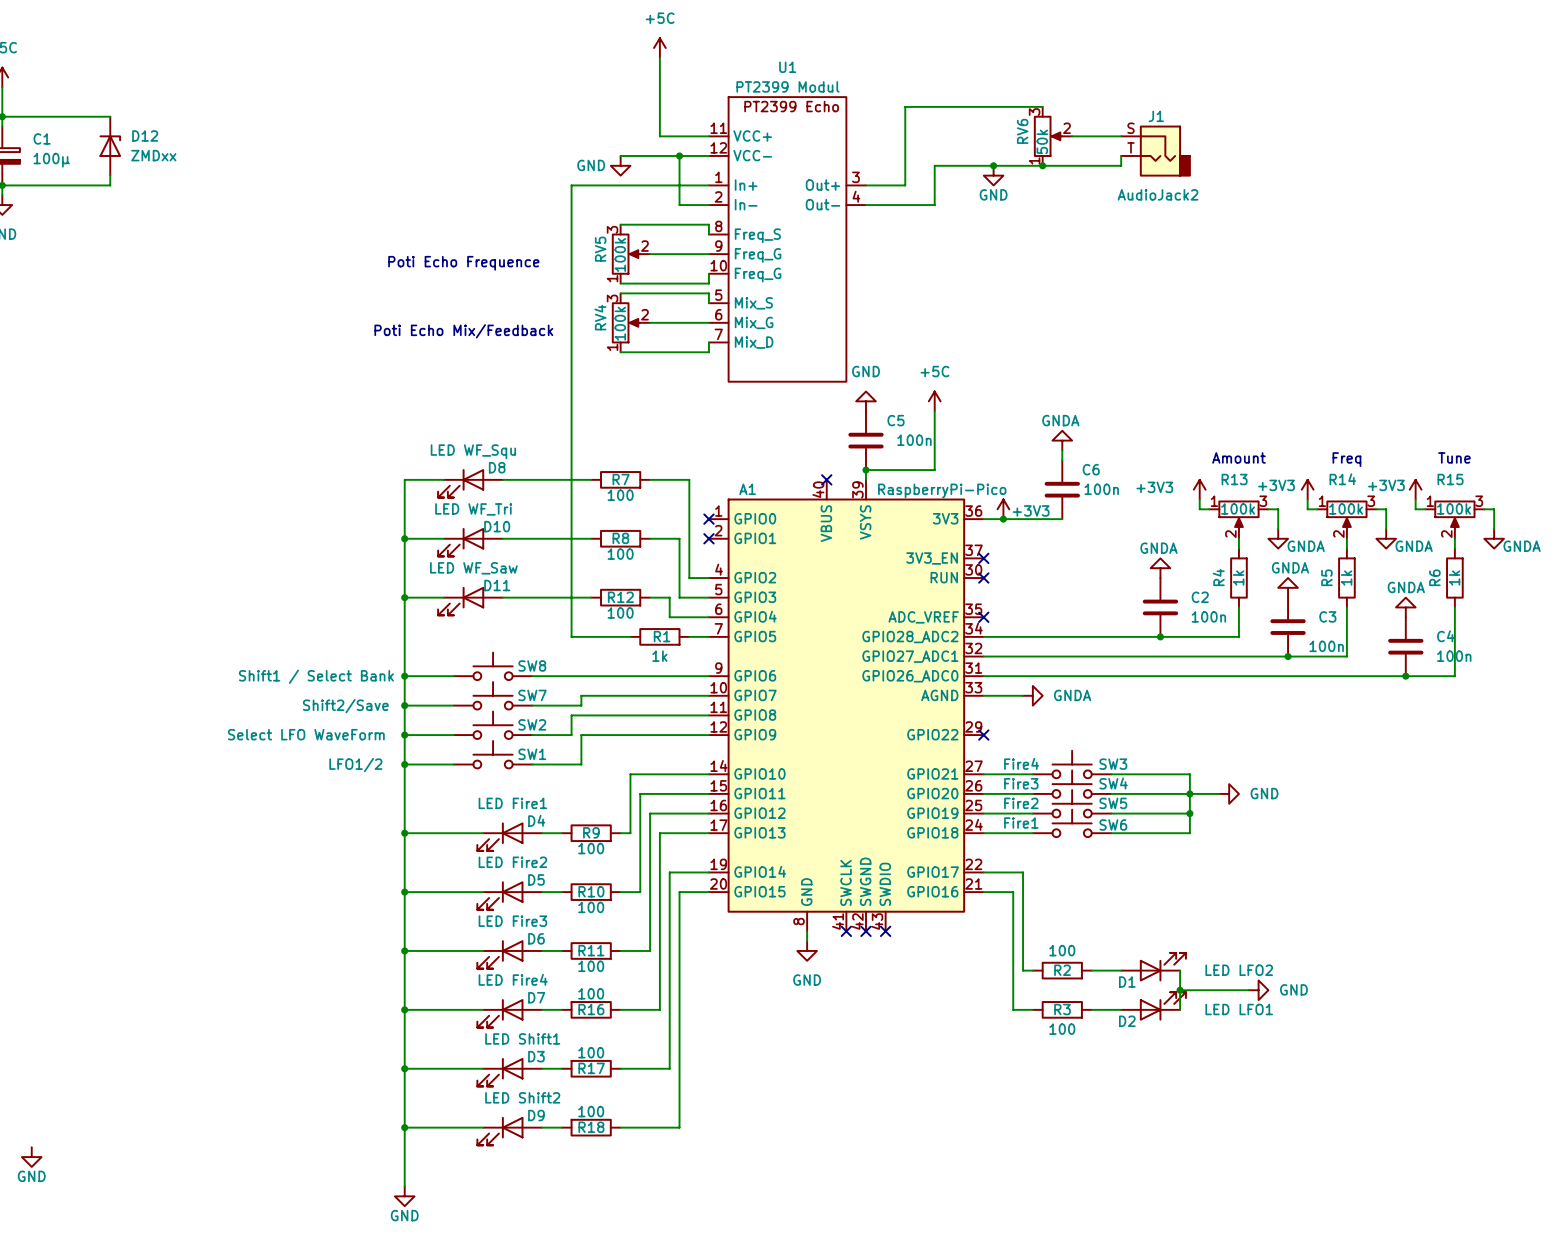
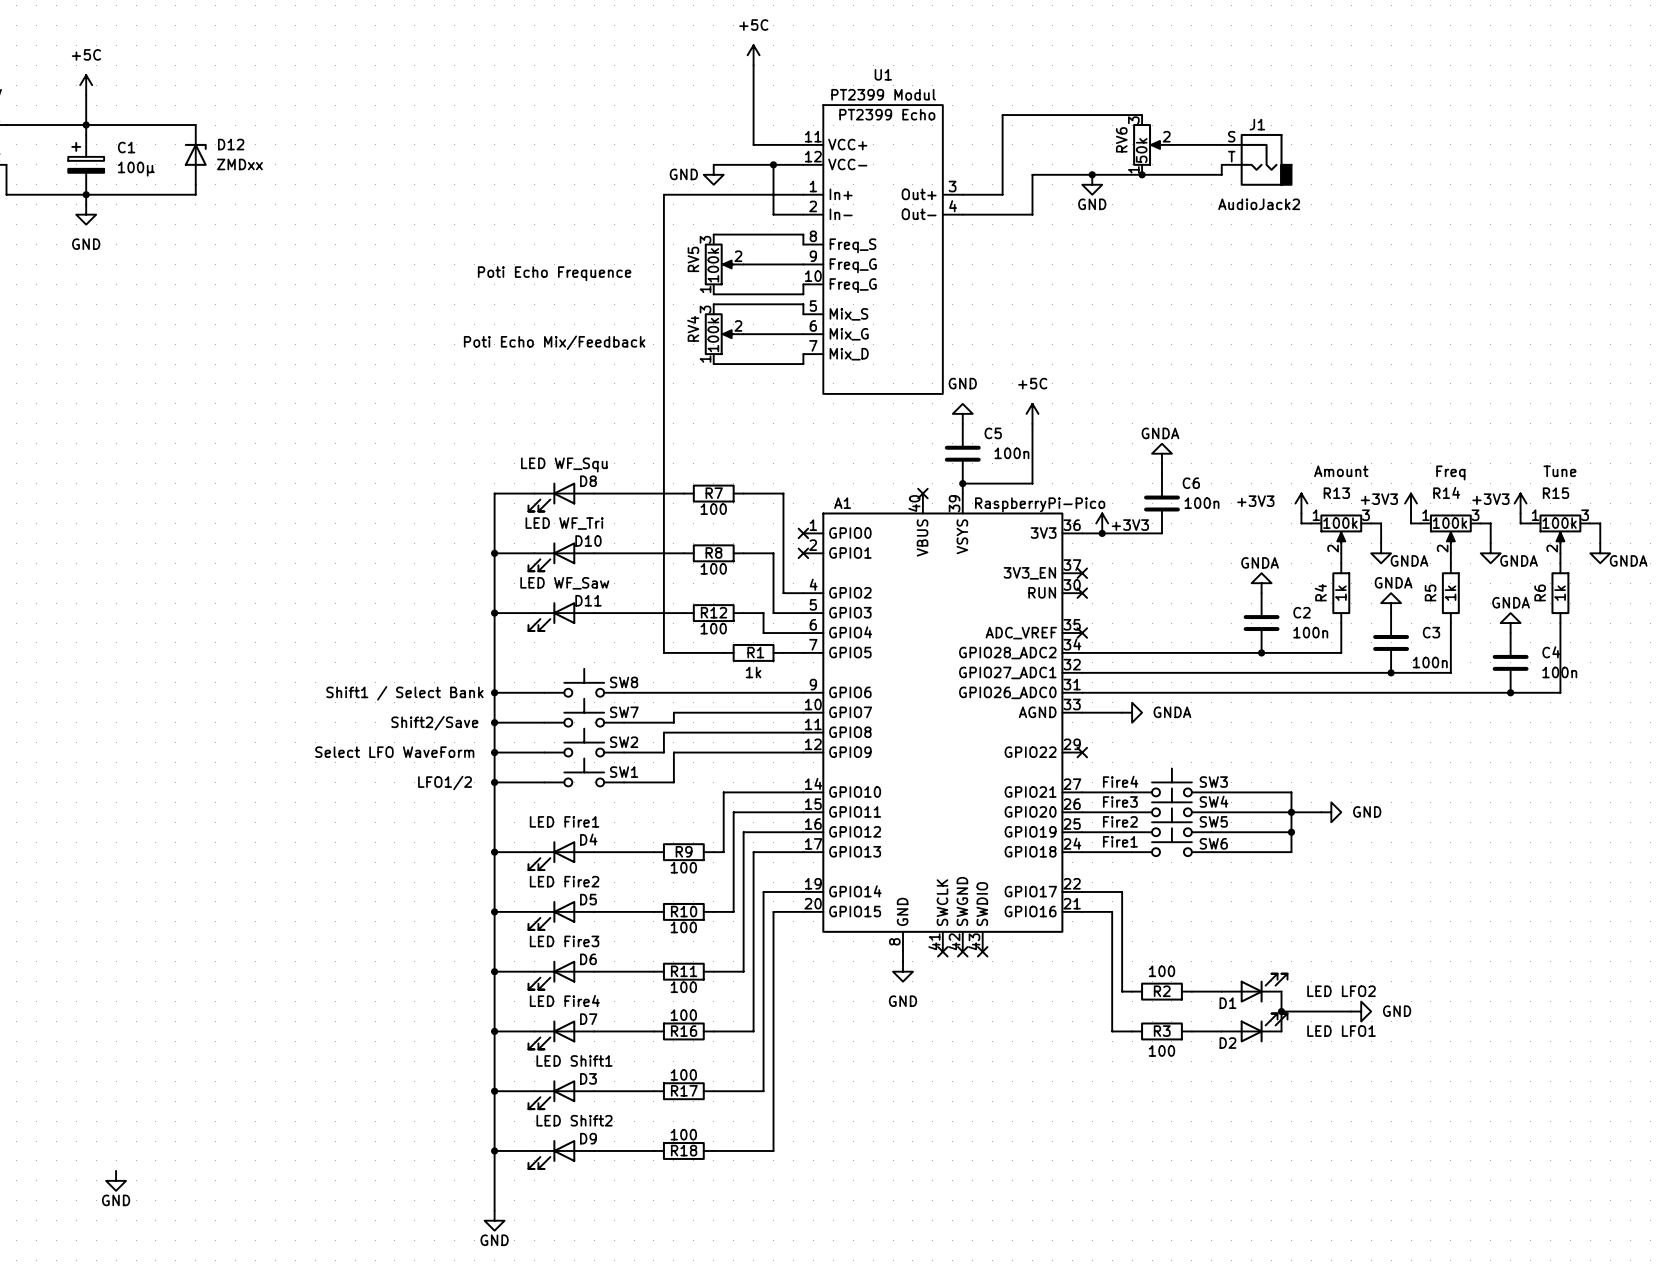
D4 position: (509, 836) -> (561, 855)
D5 position: (509, 895) -> (561, 915)
D6 position: (509, 954) -> (561, 975)
D7 position: (509, 1013) -> (561, 1034)
D3 position: (509, 1072) -> (561, 1094)
D9 position: (509, 1131) -> (561, 1154)

